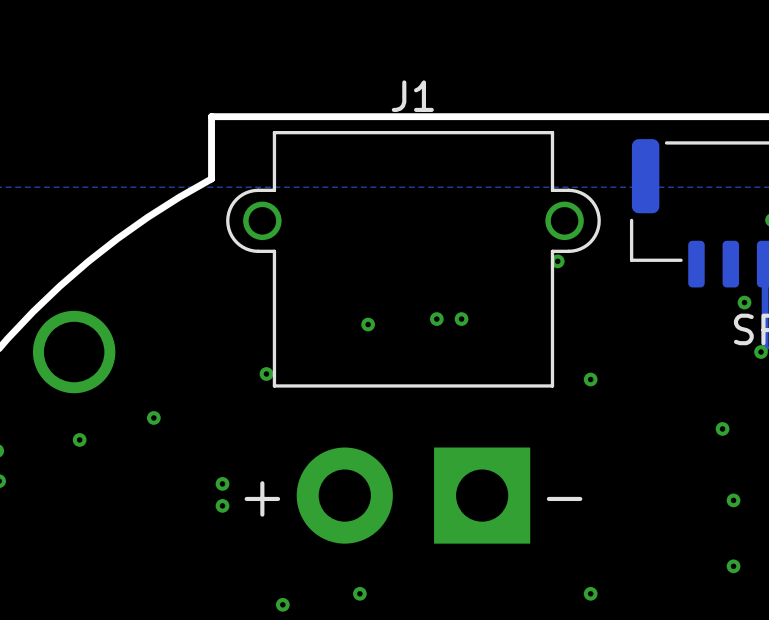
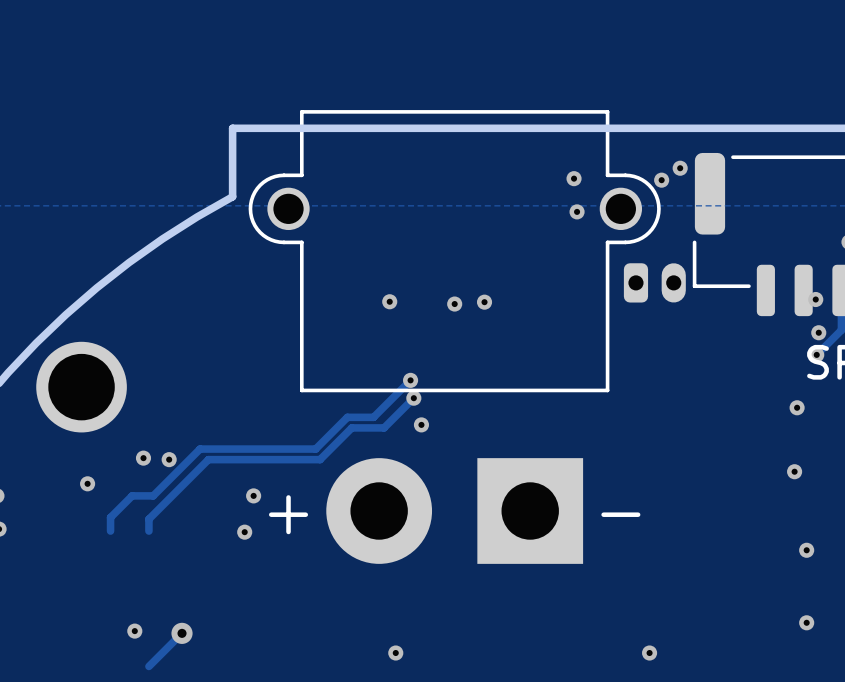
via: none -> (680, 168)
via: none -> (574, 178)
via: none -> (661, 180)
via: none -> (577, 211)
part: none -> (654, 282)
via: (557, 261) -> none
via: none -> (815, 299)
via: none -> (389, 301)
via: none -> (484, 302)
via: none -> (454, 304)
track: (765, 300) (765, 347) (761, 352) -> (841, 330) (816, 354)
part: none -> (454, 336)
via: (436, 319) -> none
via: (461, 319) -> none
via: none -> (816, 354)
via: (368, 324) -> none
J1: (413, 337) -> none
track: none -> (410, 380) (373, 417) (347, 417) (315, 449) (200, 449) (153, 495) (132, 495) (110, 517) (110, 531)
via: none -> (410, 380)
via: (761, 352) -> none
track: none -> (413, 398) (384, 427) (351, 427) (320, 459) (208, 459) (148, 519) (148, 531)
via: none -> (413, 398)
via: none -> (797, 407)
via: (266, 374) -> none
via: (590, 379) -> none
via: none -> (421, 424)
via: none -> (143, 458)
via: none -> (253, 495)
via: (222, 505) -> none
via: none -> (134, 631)
track: none -> (182, 633) (148, 666)
via: none -> (182, 633)
via: (282, 604) -> none

